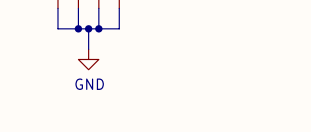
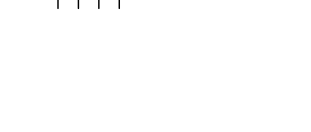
wire: (57, 8) (57, 28) (119, 28) (119, 8) -> none
wire: (78, 8) (78, 28) -> none
wire: (98, 8) (98, 28) -> none
junction: (78, 28) -> none
wire: (88, 28) (88, 49) -> none
junction: (88, 28) -> none
junction: (98, 28) -> none
power symbol: GND (88, 59) -> none

